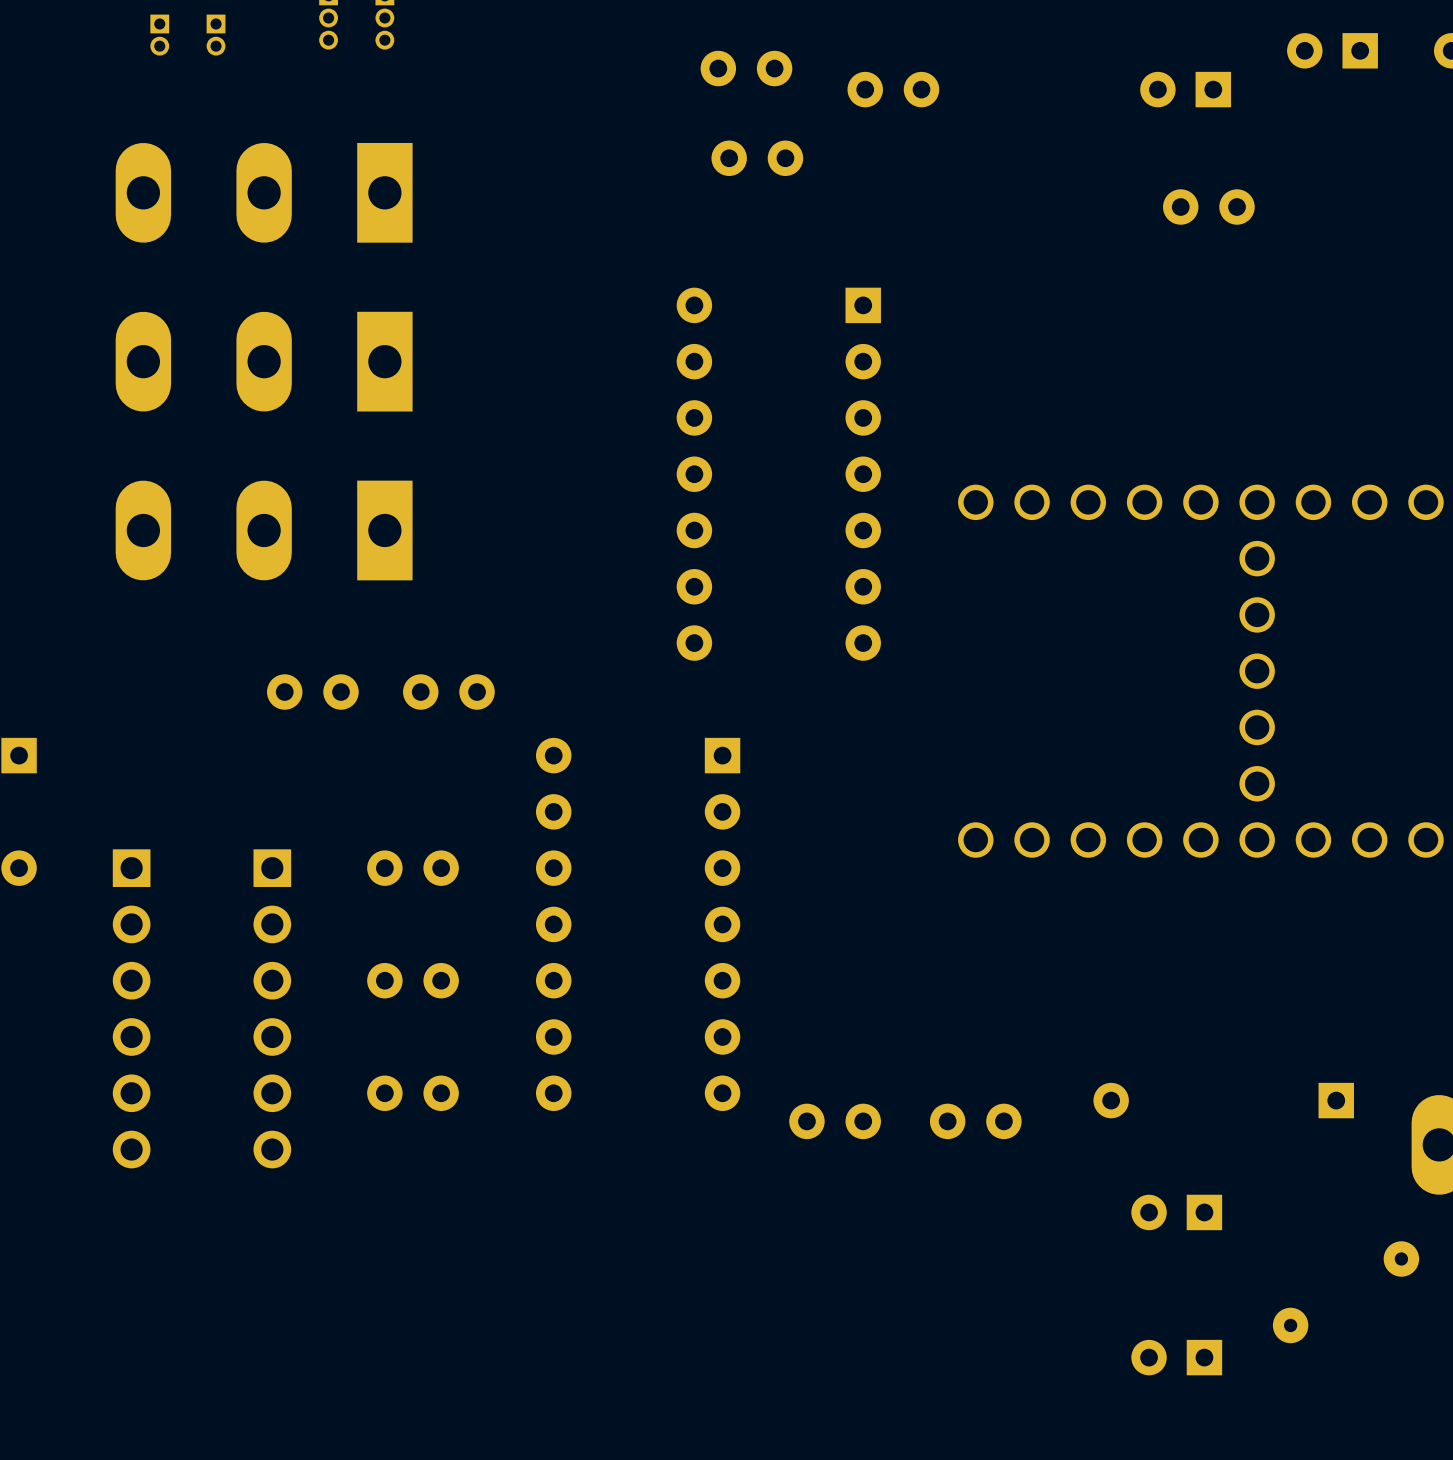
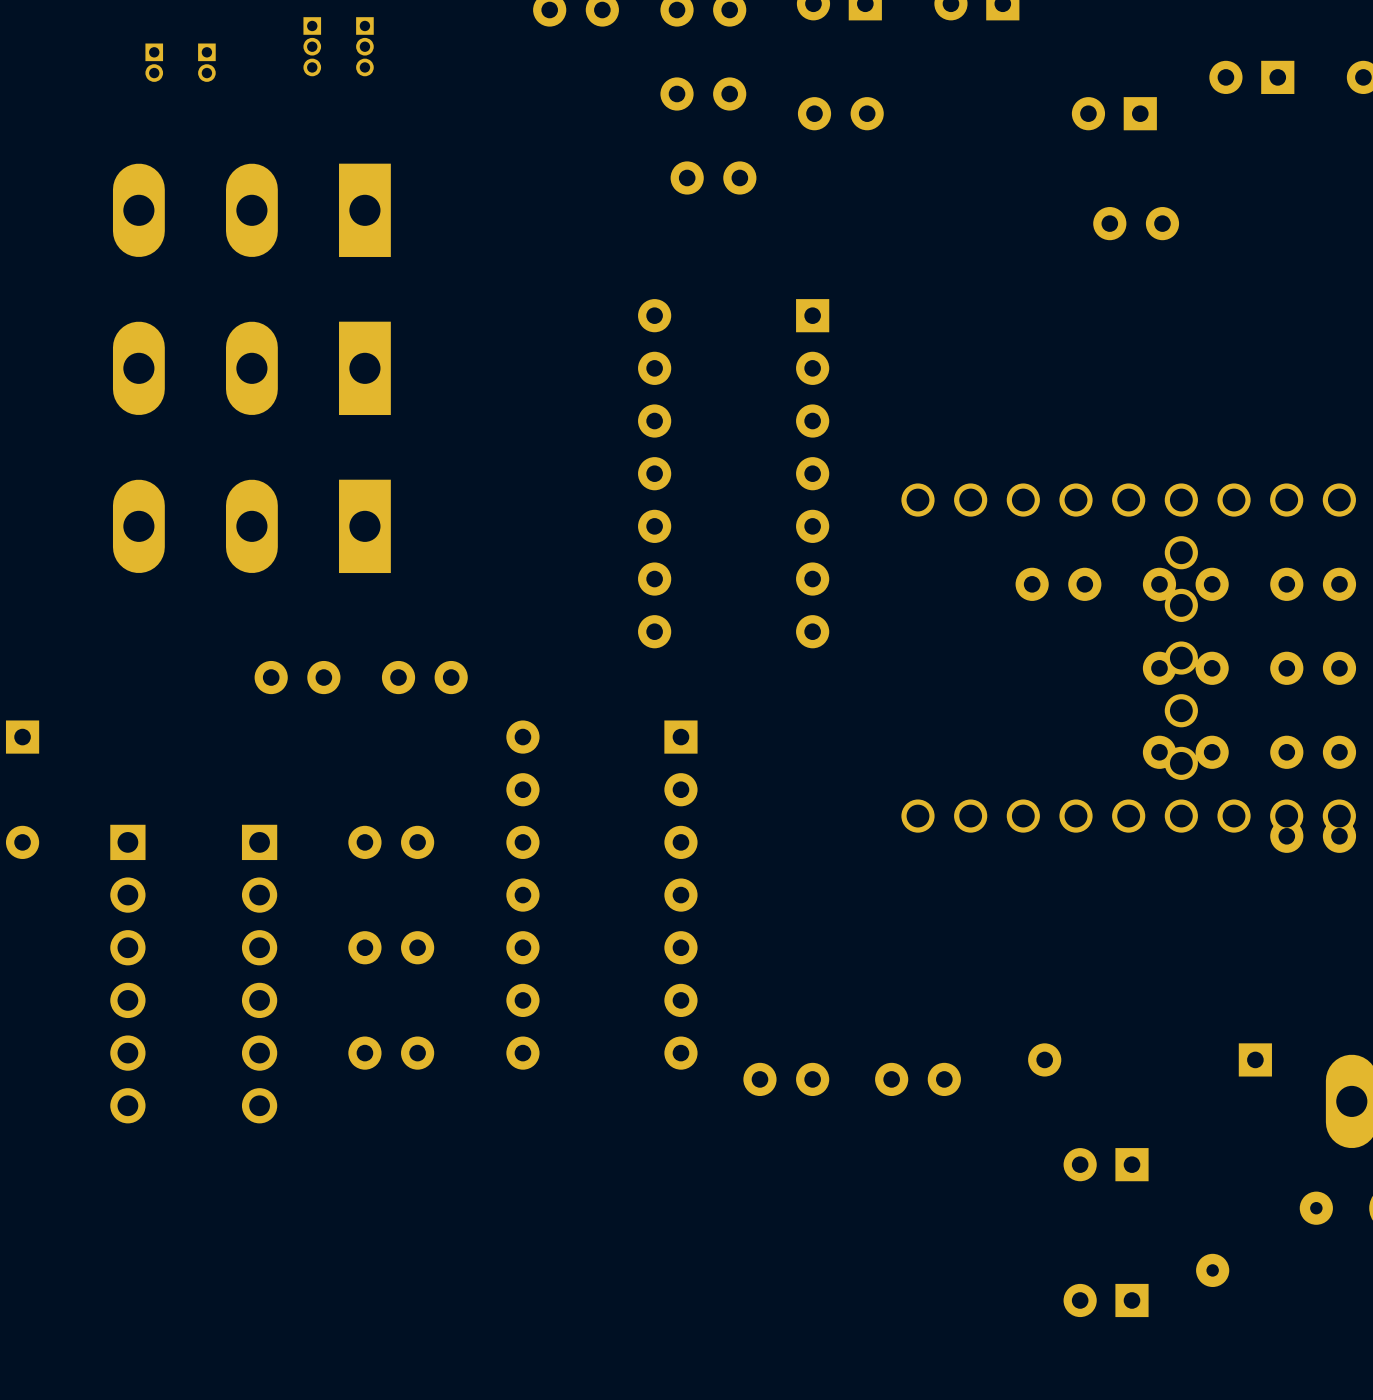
part: none -> (1058, 584)
part: none -> (1185, 584)
part: none -> (1313, 584)
part: none -> (1185, 668)
part: none -> (1313, 668)
part: none -> (1185, 752)
part: none -> (1313, 752)
part: none -> (1313, 836)

